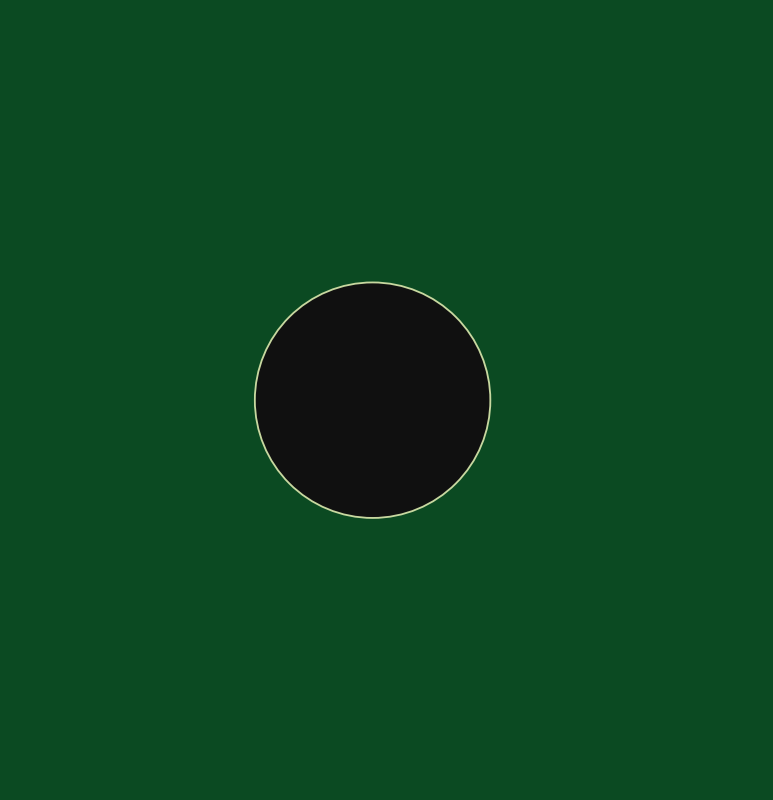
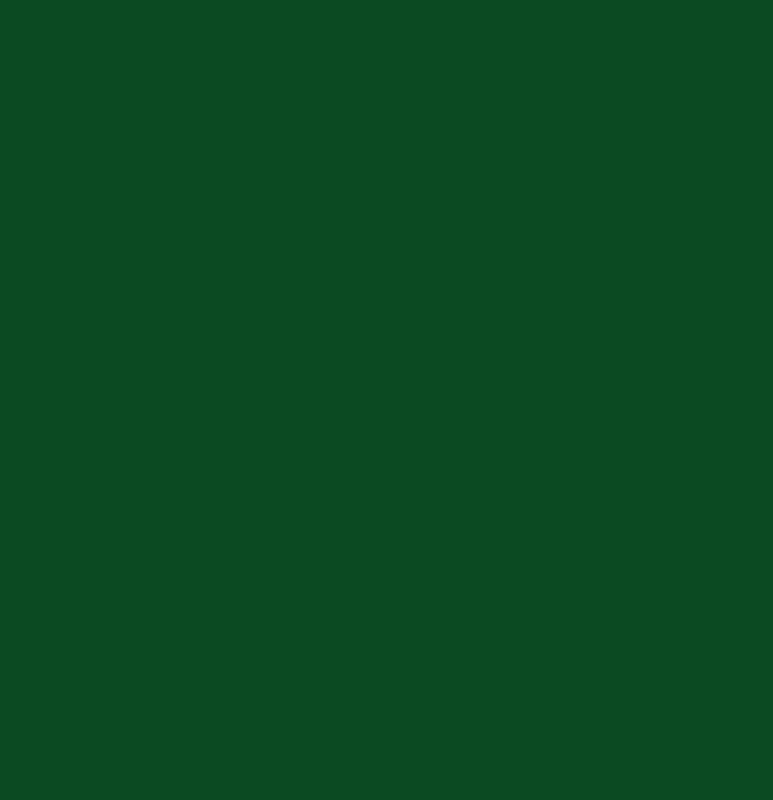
part: (372, 400) -> none

